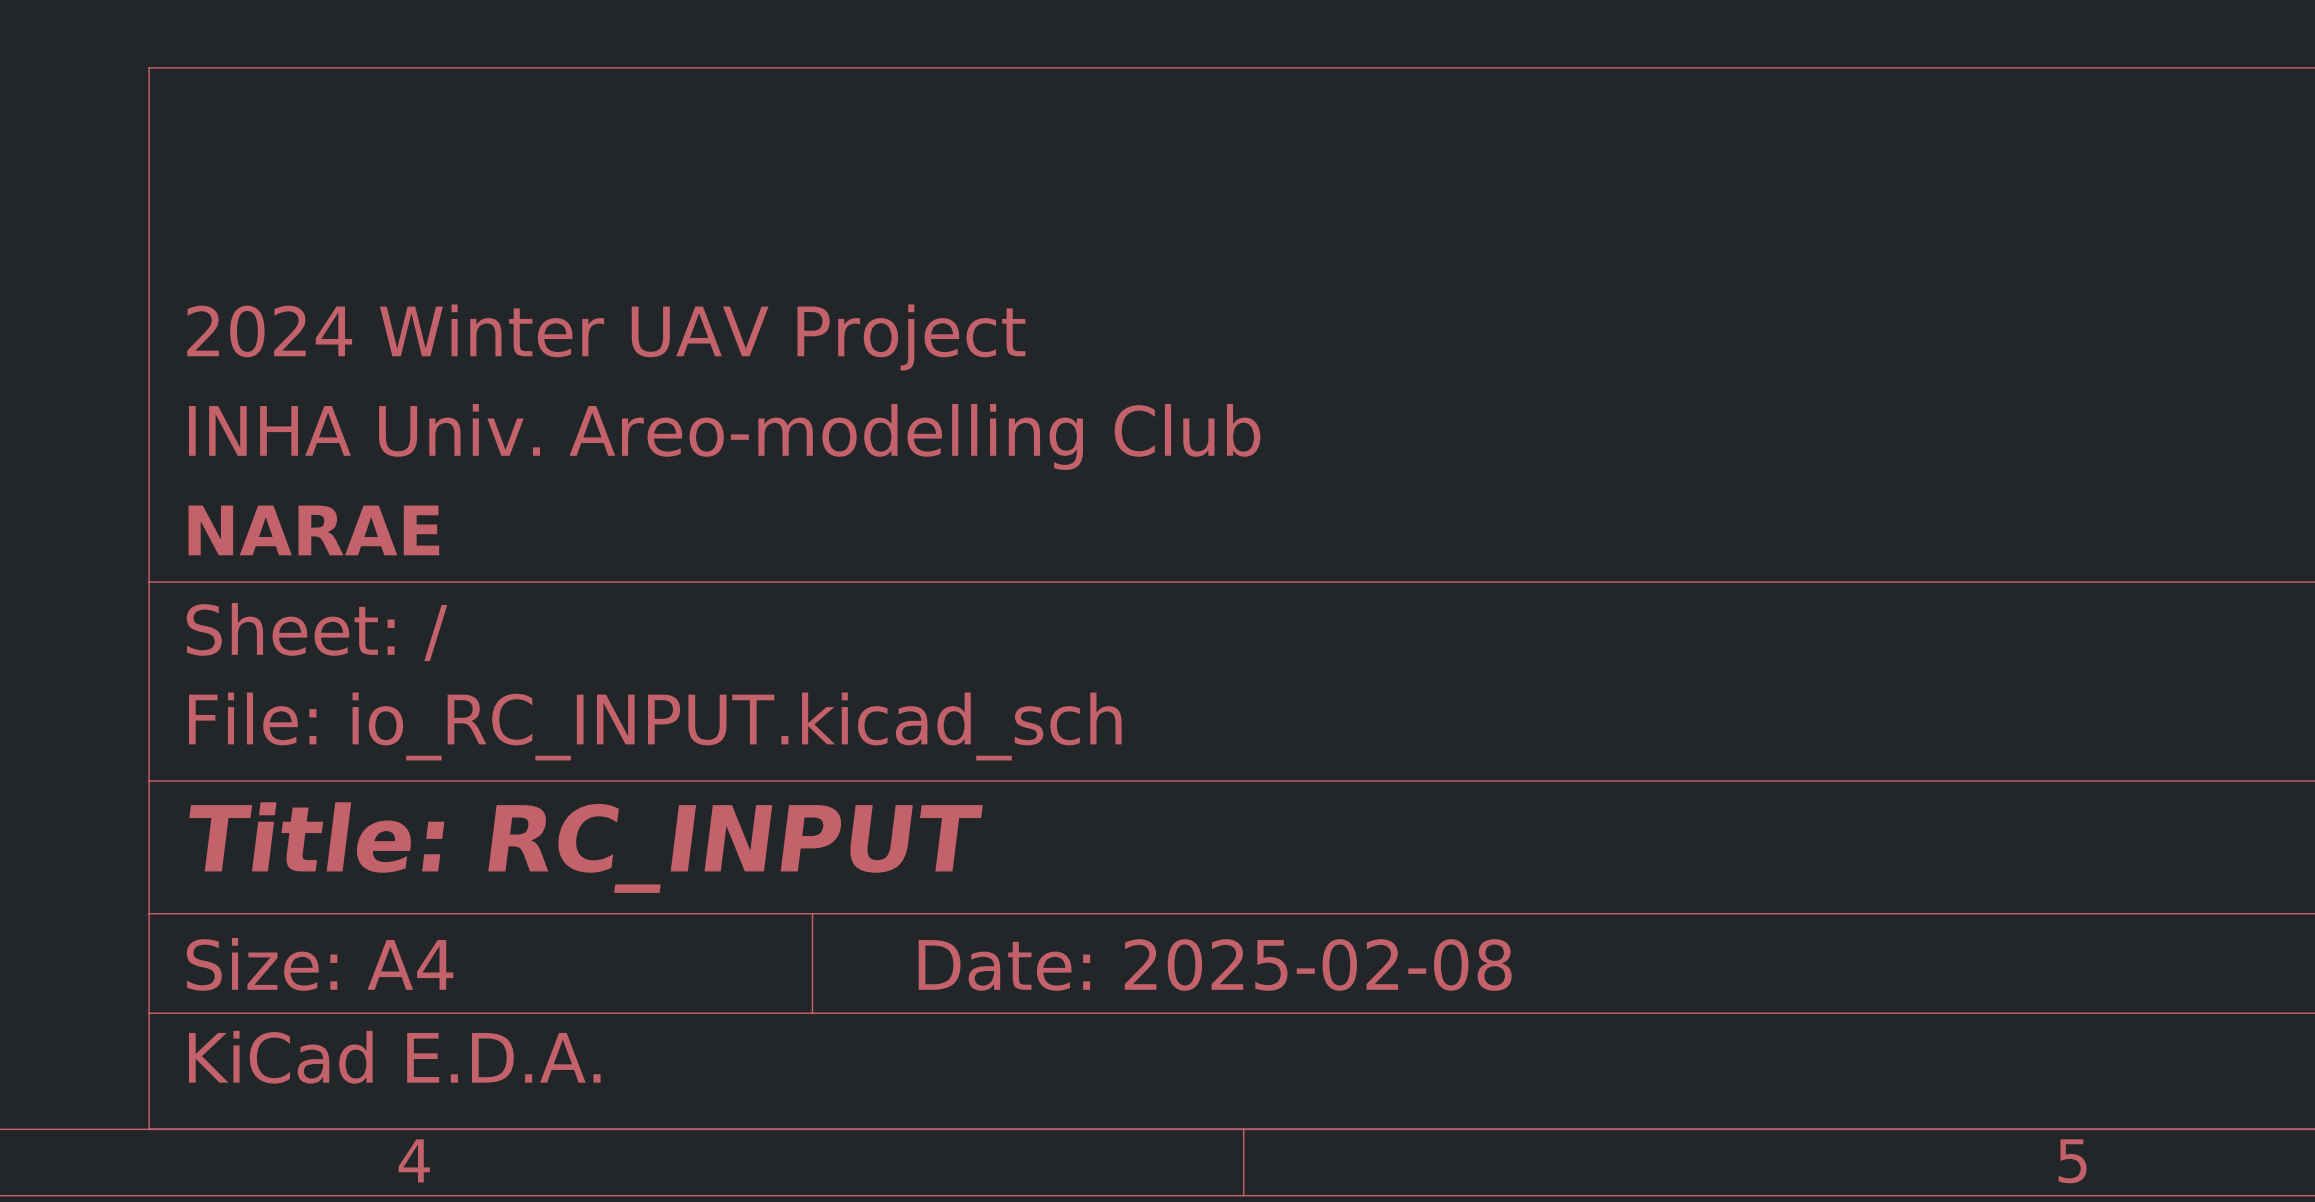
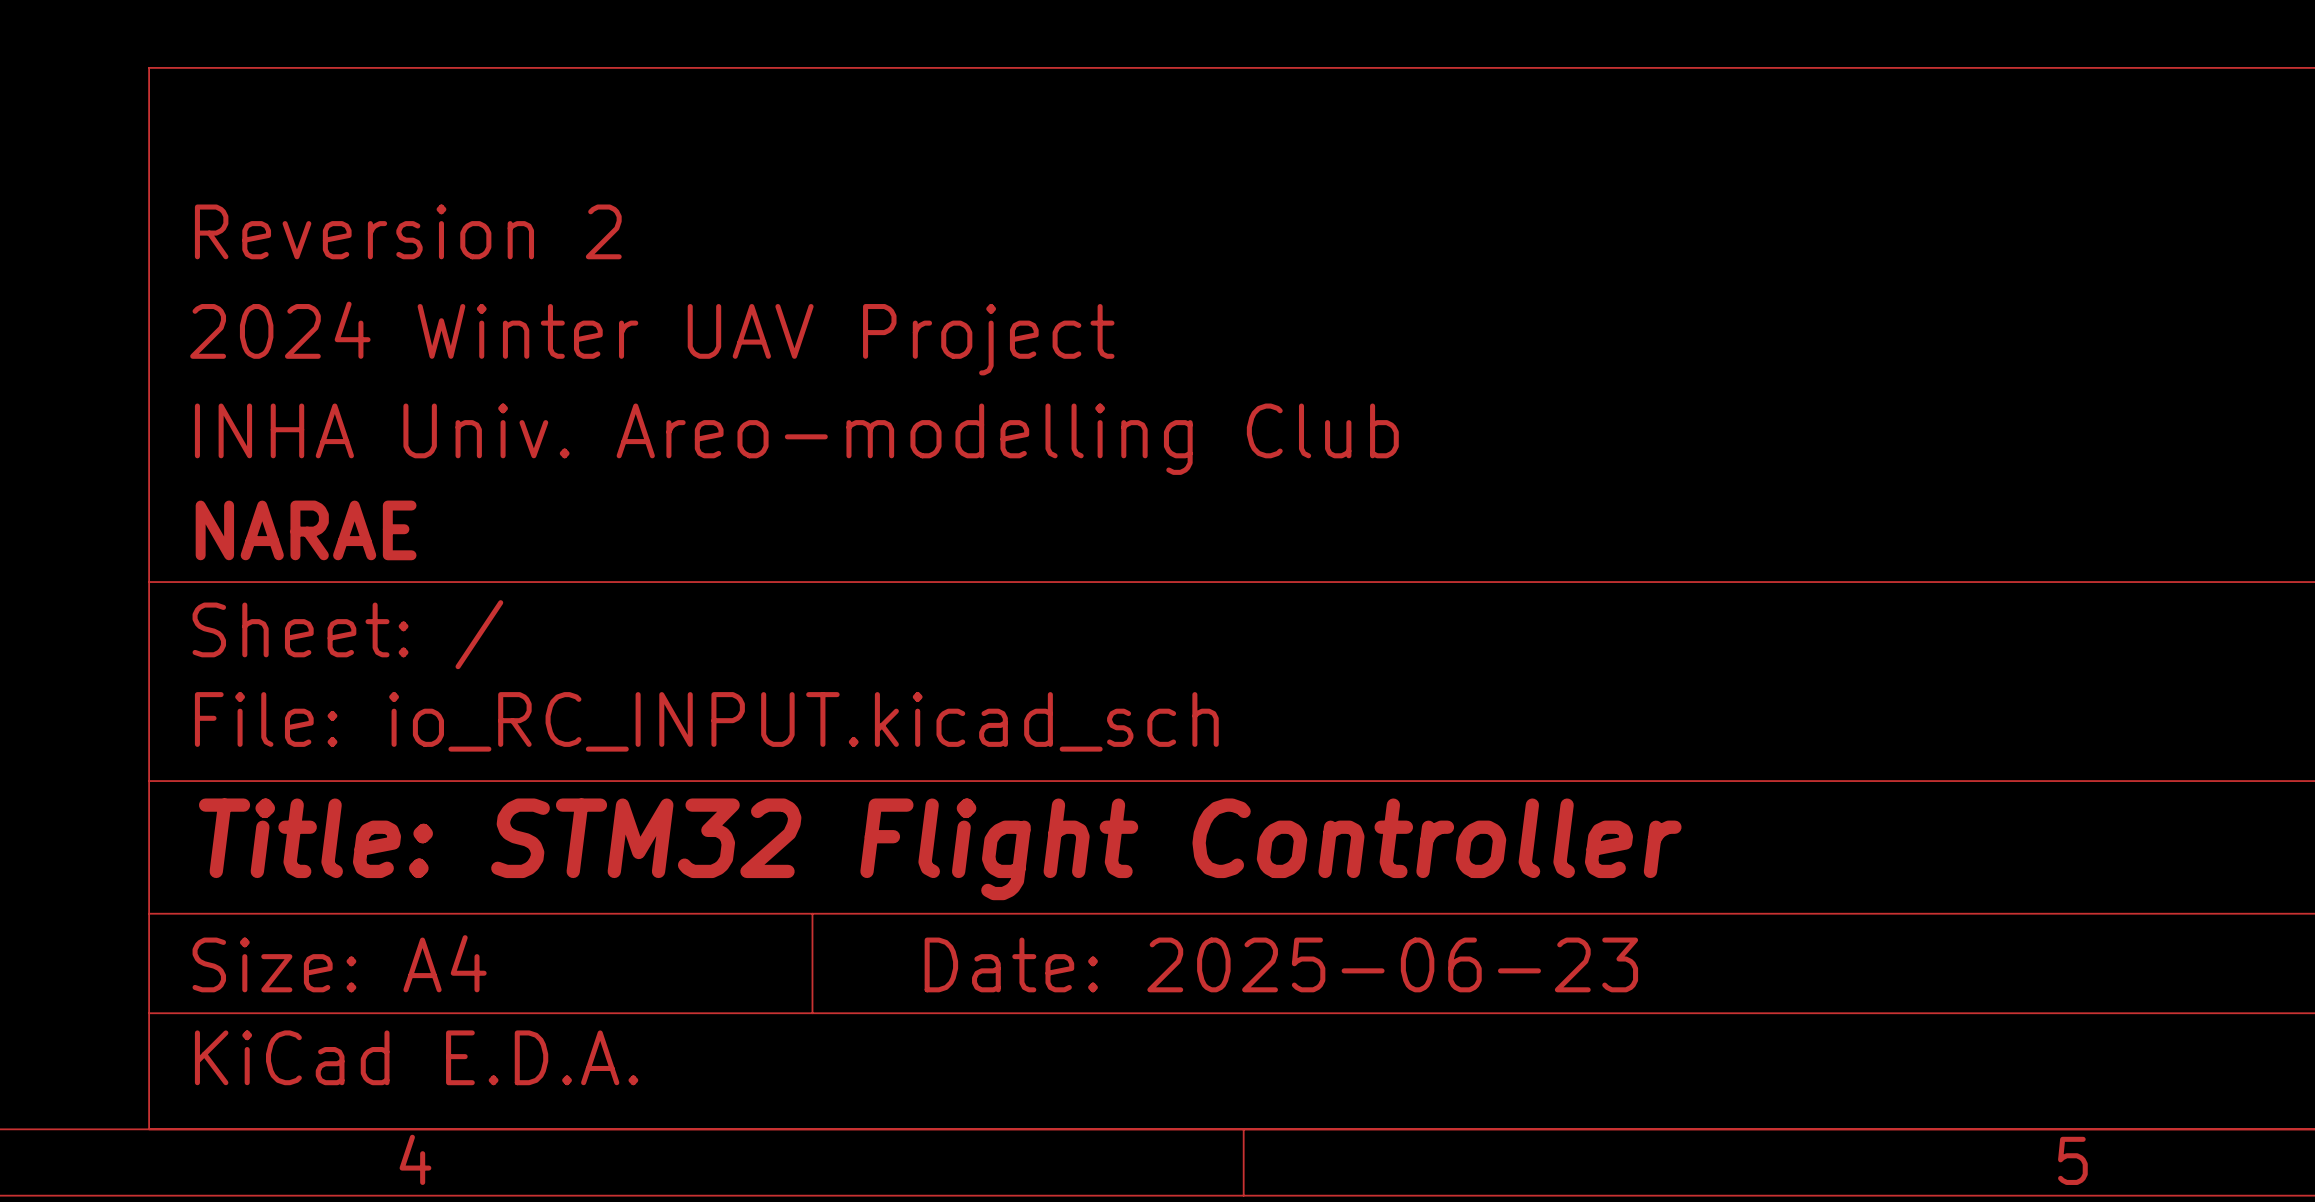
title block: none -> Reversion 2 (408, 231)
title block: Title: RC_INPUT (586, 847) -> Title: STM32 Flight Controller (940, 849)
title block: Date: 2025-02-08 (1215, 964) -> Date: 2025-06-23 (1281, 964)

